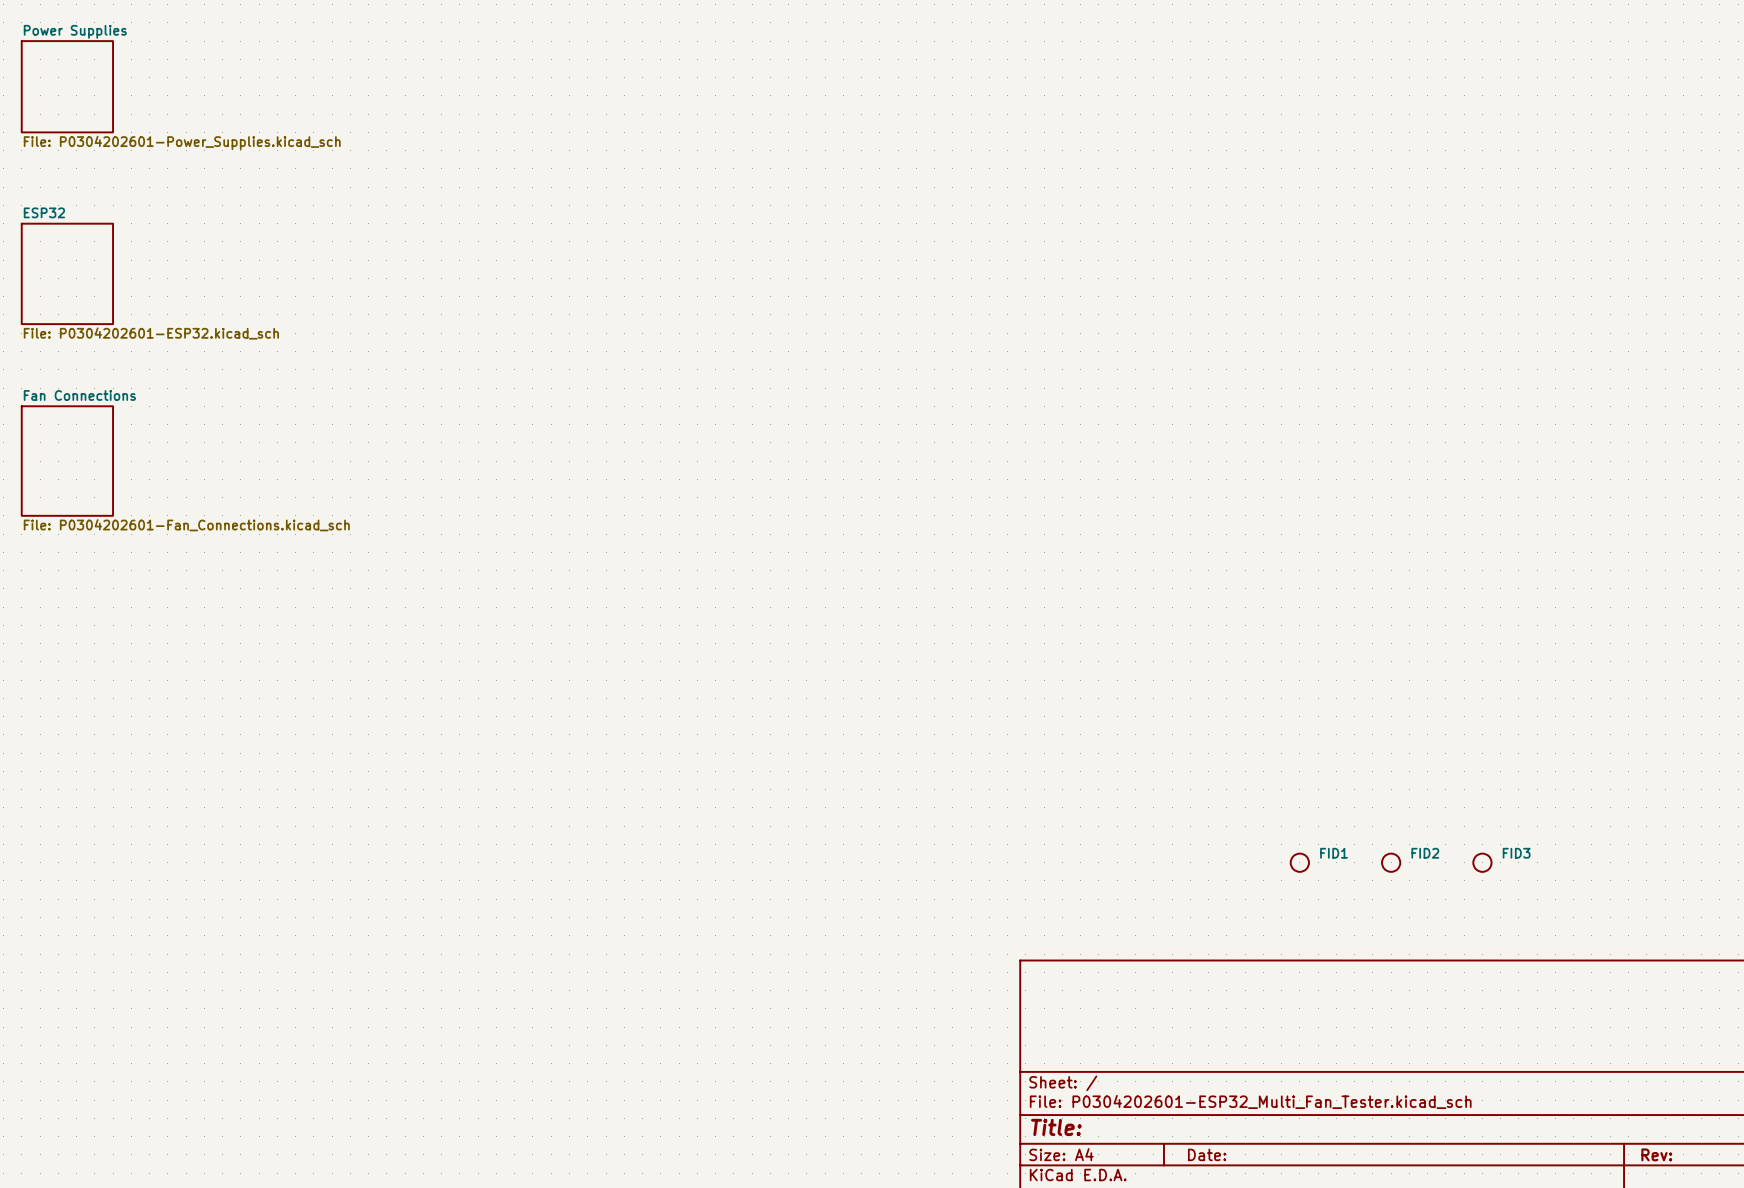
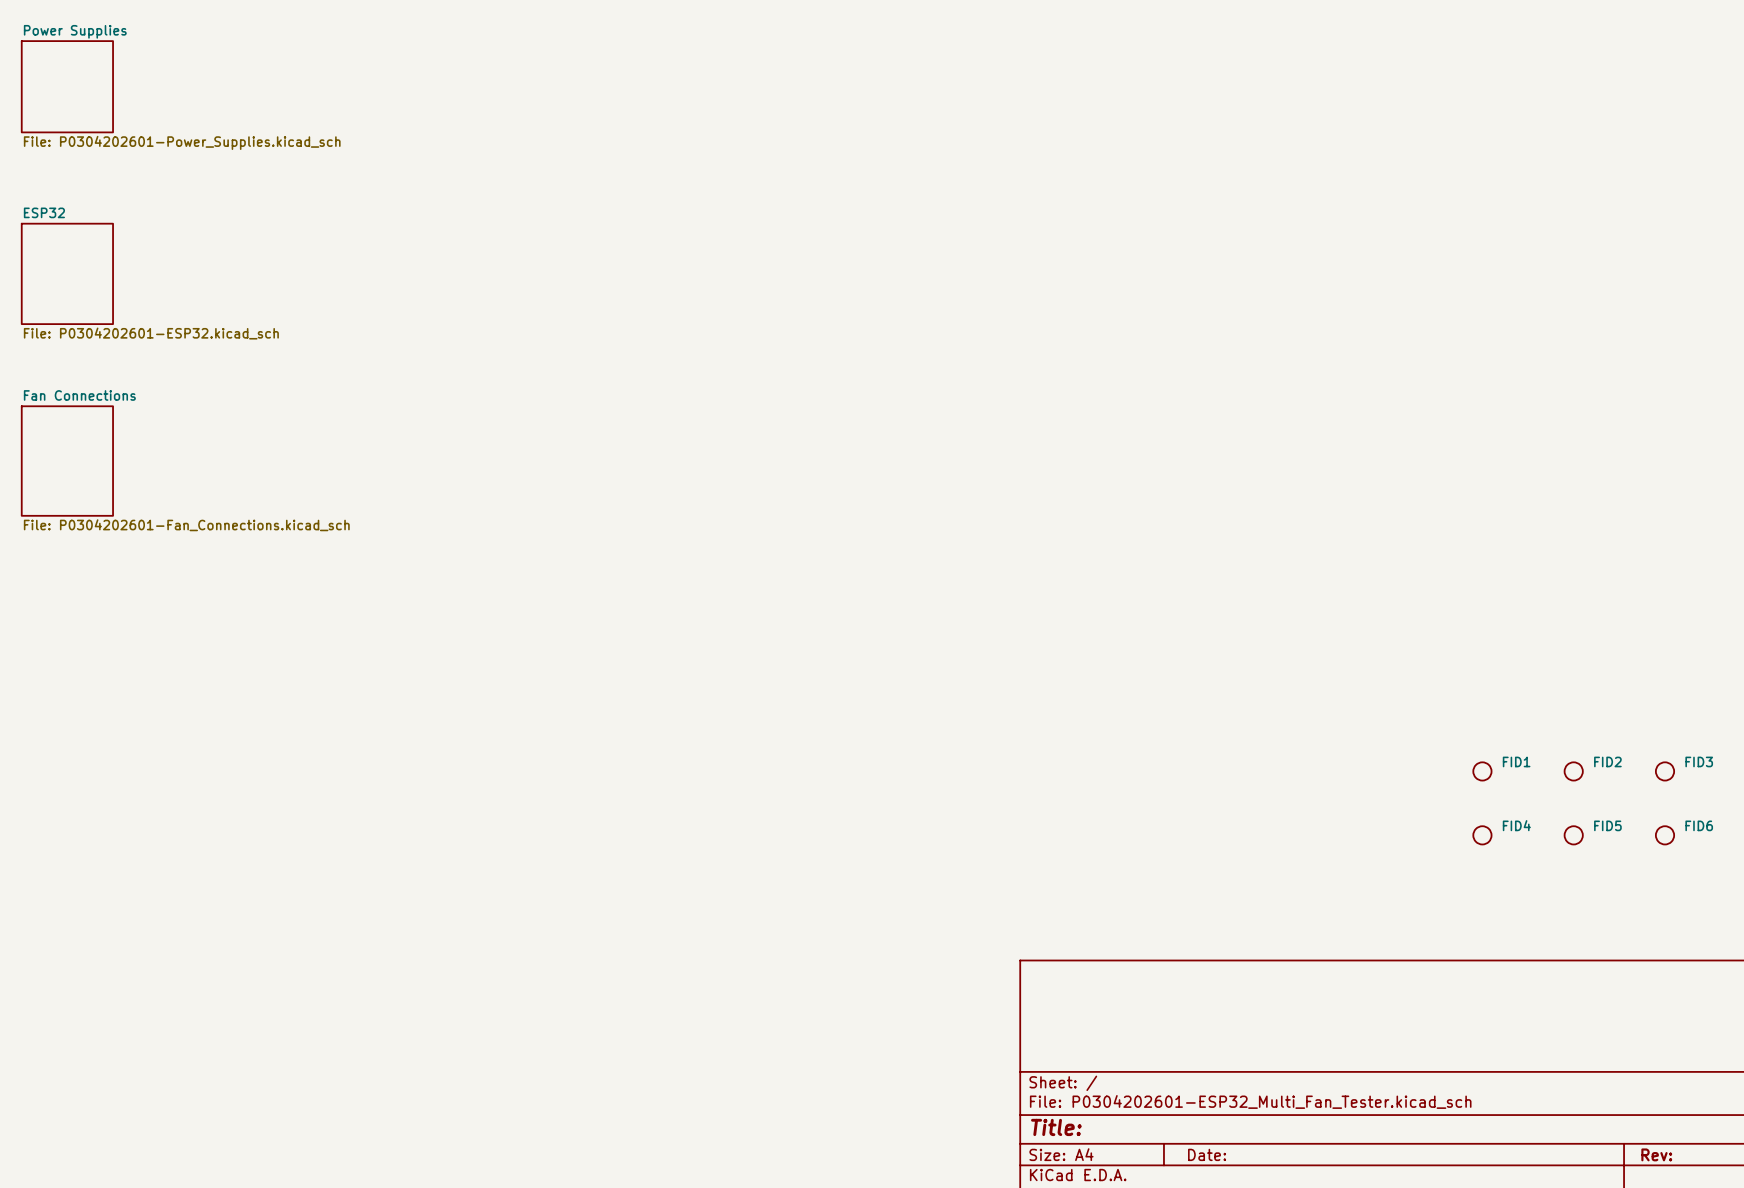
FID4: none -> (1482, 835)
FID5: none -> (1573, 835)
FID6: none -> (1665, 835)
FID1 position: (1299, 862) -> (1482, 771)
FID2 position: (1391, 862) -> (1573, 771)
FID3 position: (1482, 862) -> (1665, 771)

